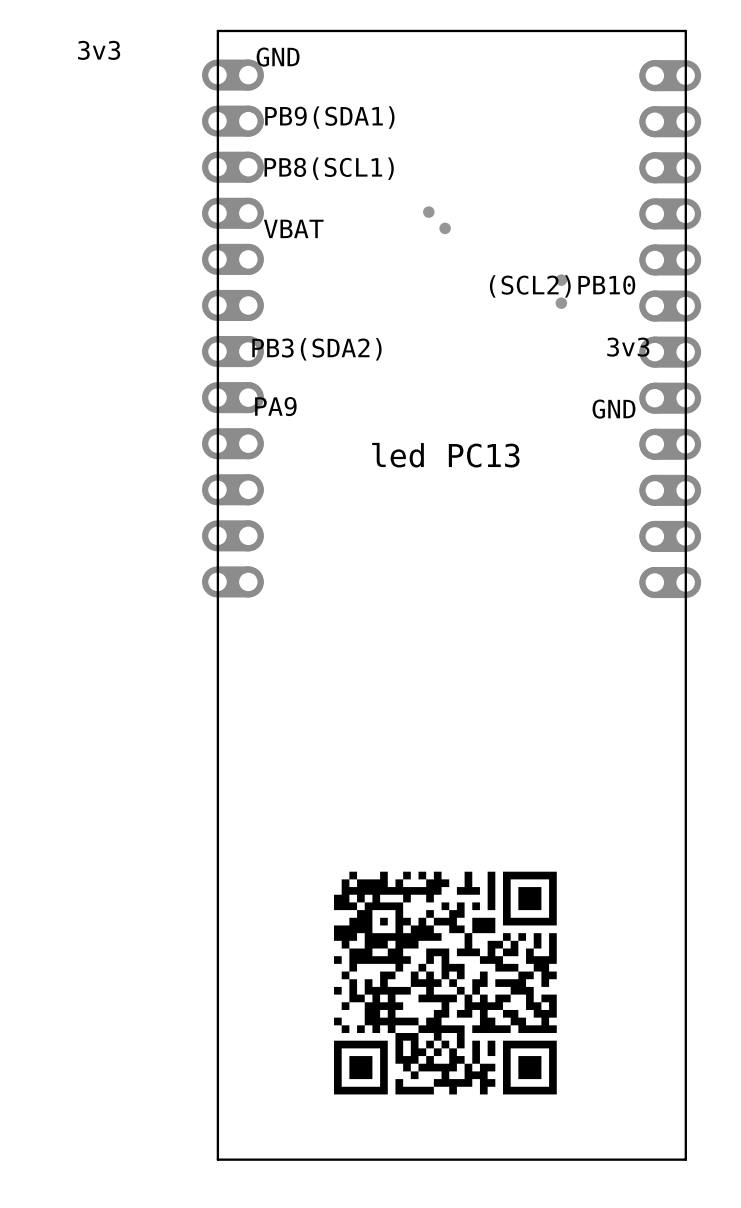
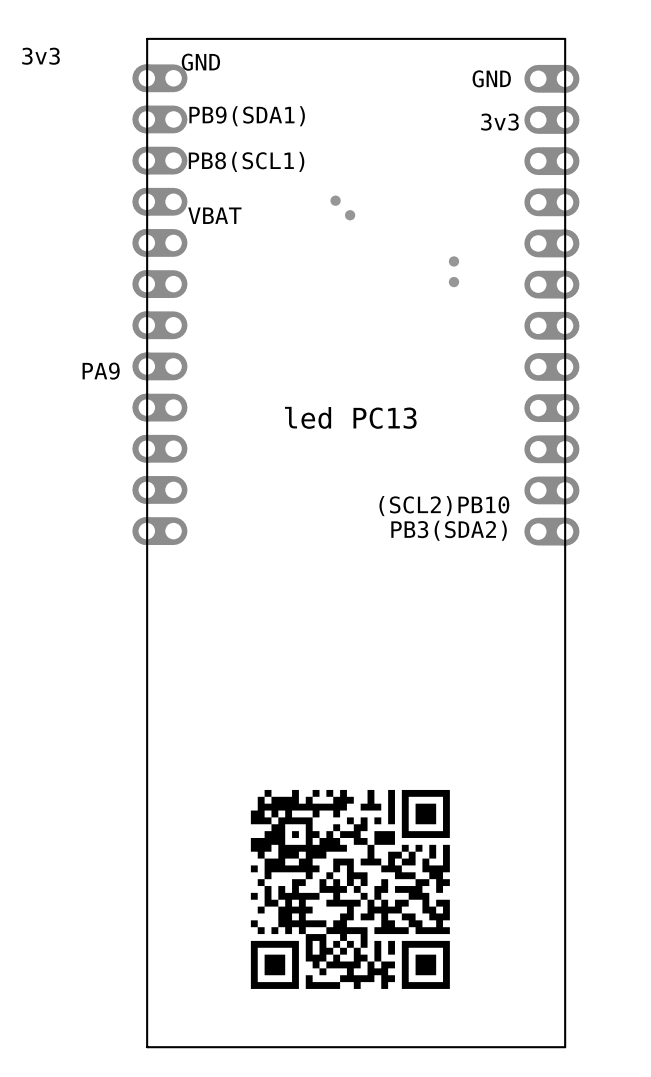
part footprint: [201, 59, 264, 598] -> [132, 64, 188, 545]
part footprint: [639, 60, 702, 599] -> [524, 64, 580, 546]
text position: (SCL2)PB10 (562, 286) -> (SCL2)PB10 (444, 506)
text position: 3v3 (628, 347) -> 3v3 (500, 122)
text position: PB3(SDA2) (316, 349) -> PB3(SDA2) (449, 530)
text position: PA9 (275, 406) -> PA9 (101, 371)
text position: GND (613, 409) -> GND (491, 78)

